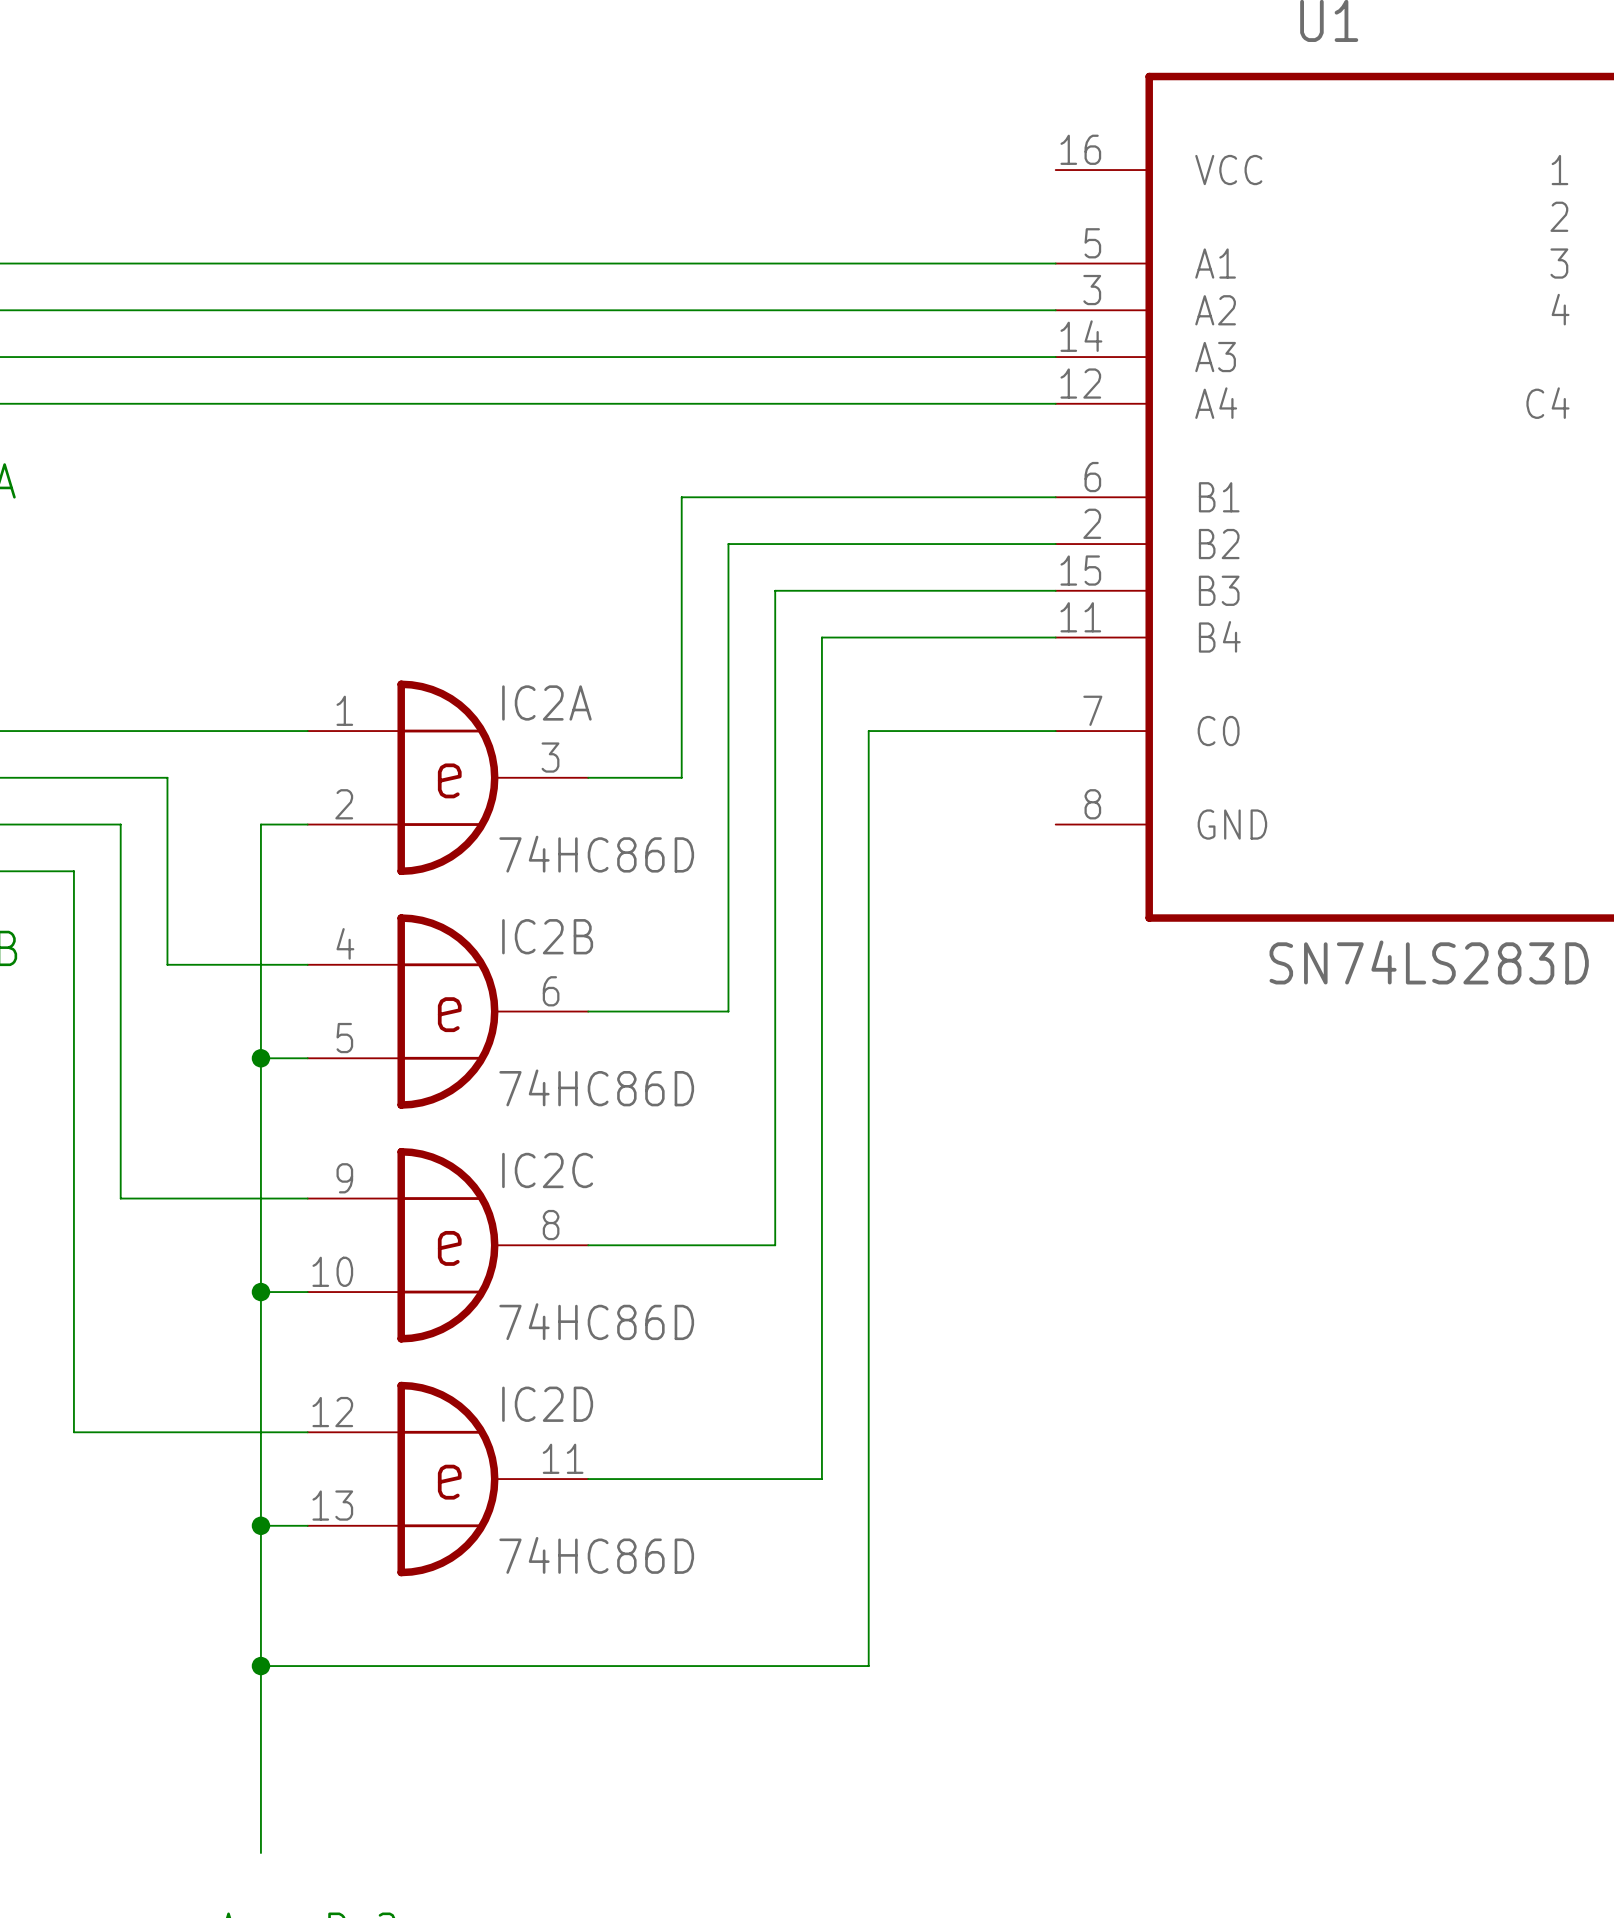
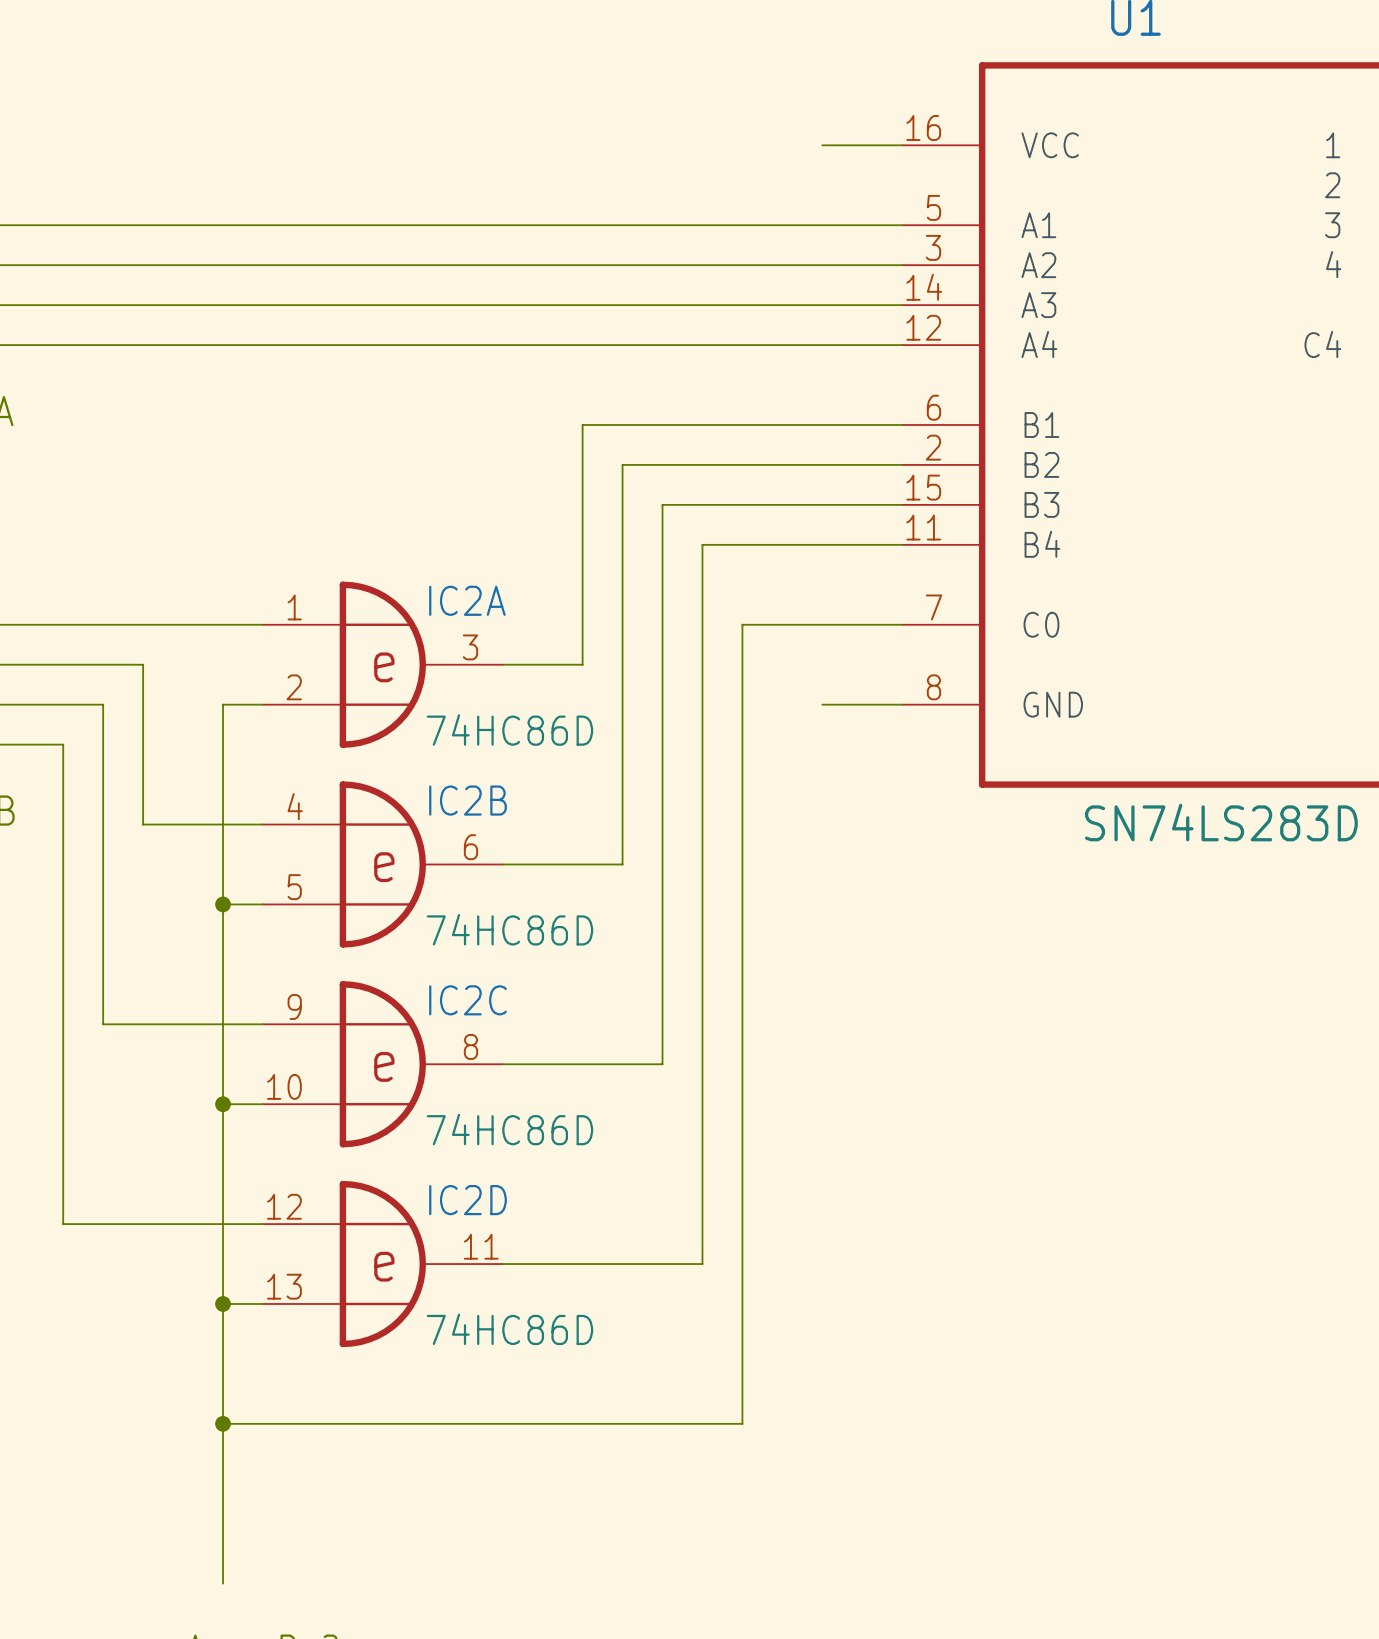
wire: none -> (822, 145) (902, 145)
wire: none -> (822, 704) (902, 704)

